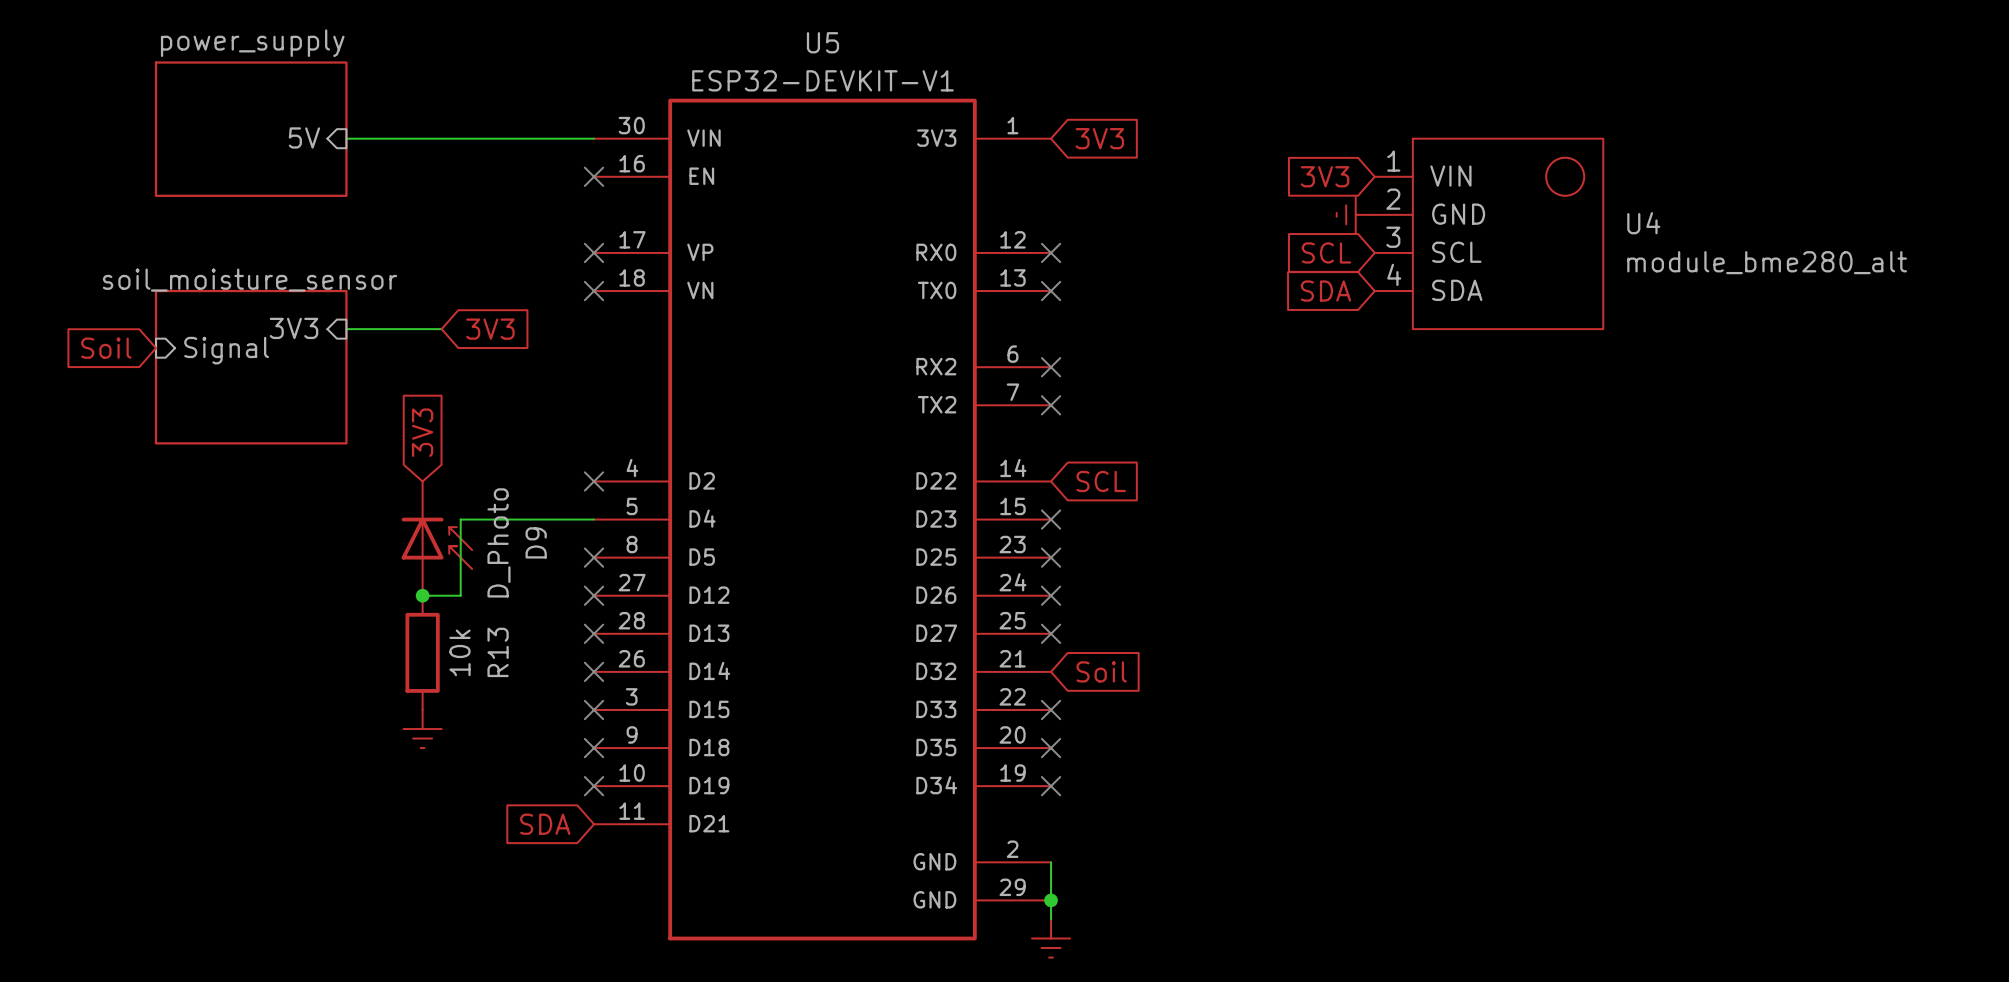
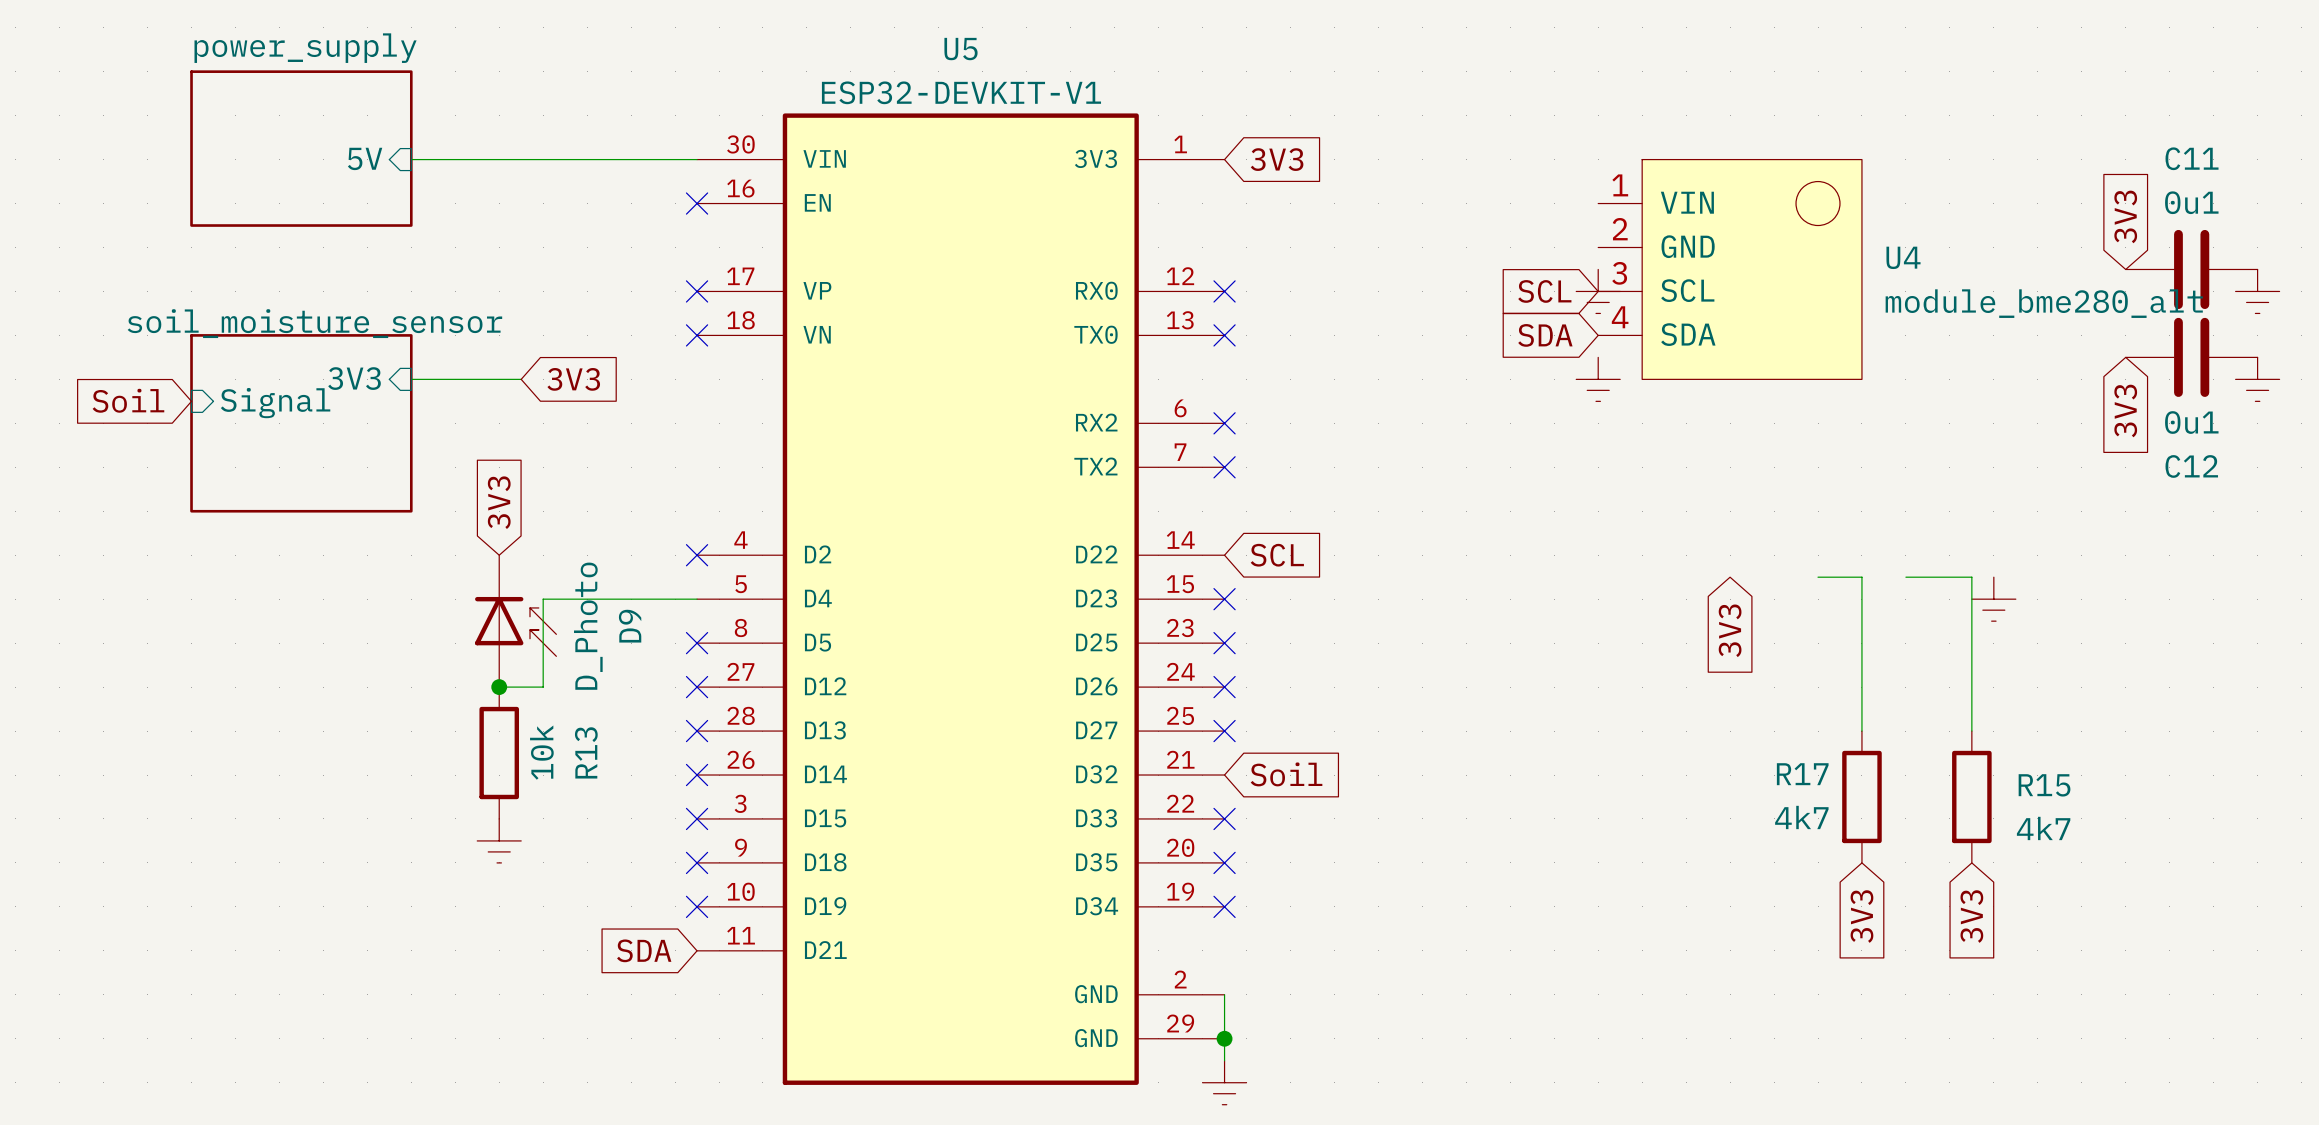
global label: 3V3 (1325, 176) -> none
global label: none -> 3V3 (2125, 216)
power symbol rotation: 0° (1355, 214) -> 90° counterclockwise (1598, 291)
power symbol position: (1355, 214) -> (1598, 291)
C11: none -> 0u1 (2191, 269)
power symbol: none -> (2257, 291)
C12: none -> 0u1 (2191, 357)
power symbol: none -> (1598, 379)
power symbol: none -> (2257, 379)
global label: none -> 3V3 (2125, 411)
wire: none -> (1818, 577) (1861, 577) (1861, 731)
wire: none -> (1905, 577) (1971, 577) (1971, 731)
power symbol: none -> (1993, 599)
global label: none -> 3V3 (1730, 630)
R17: none -> 4k7 (1861, 796)
R15: none -> 4k7 (1971, 796)
global label: none -> 3V3 (1861, 916)
global label: none -> 3V3 (1971, 916)

